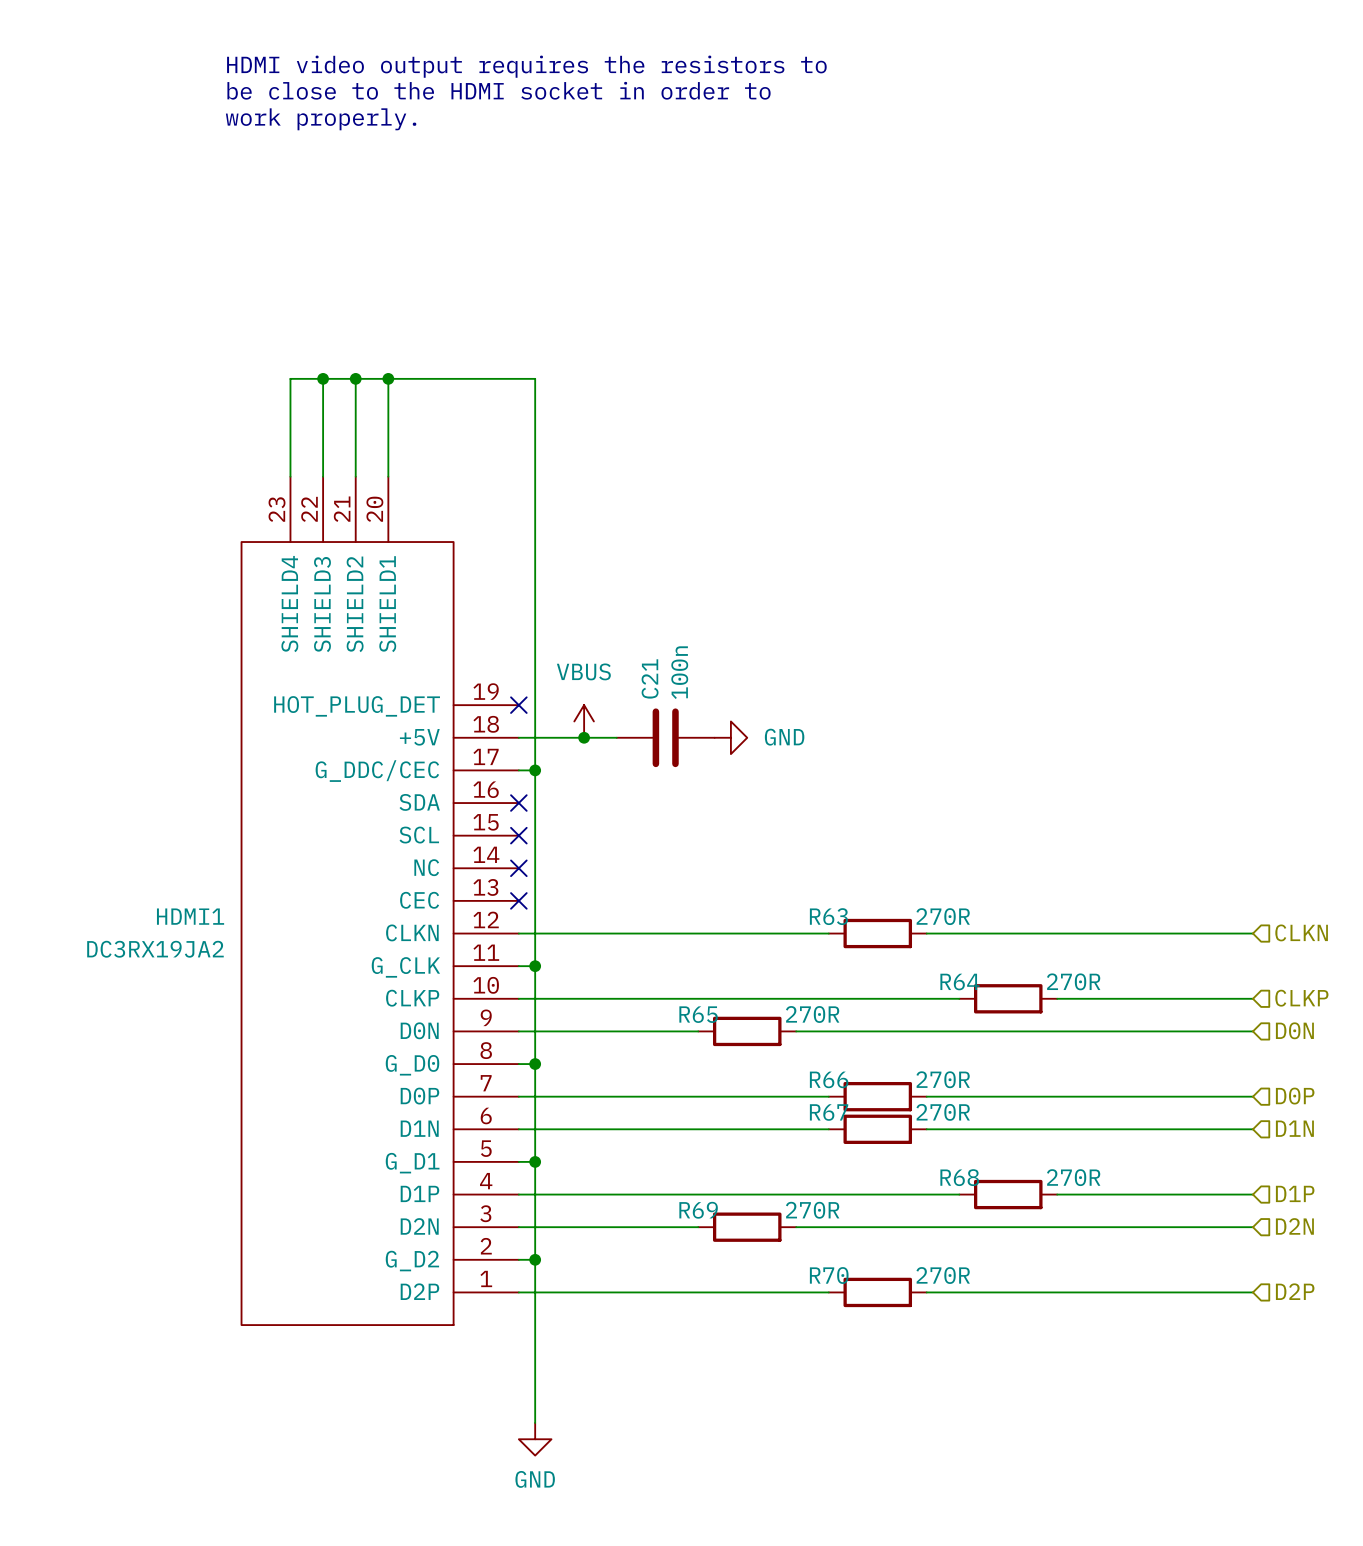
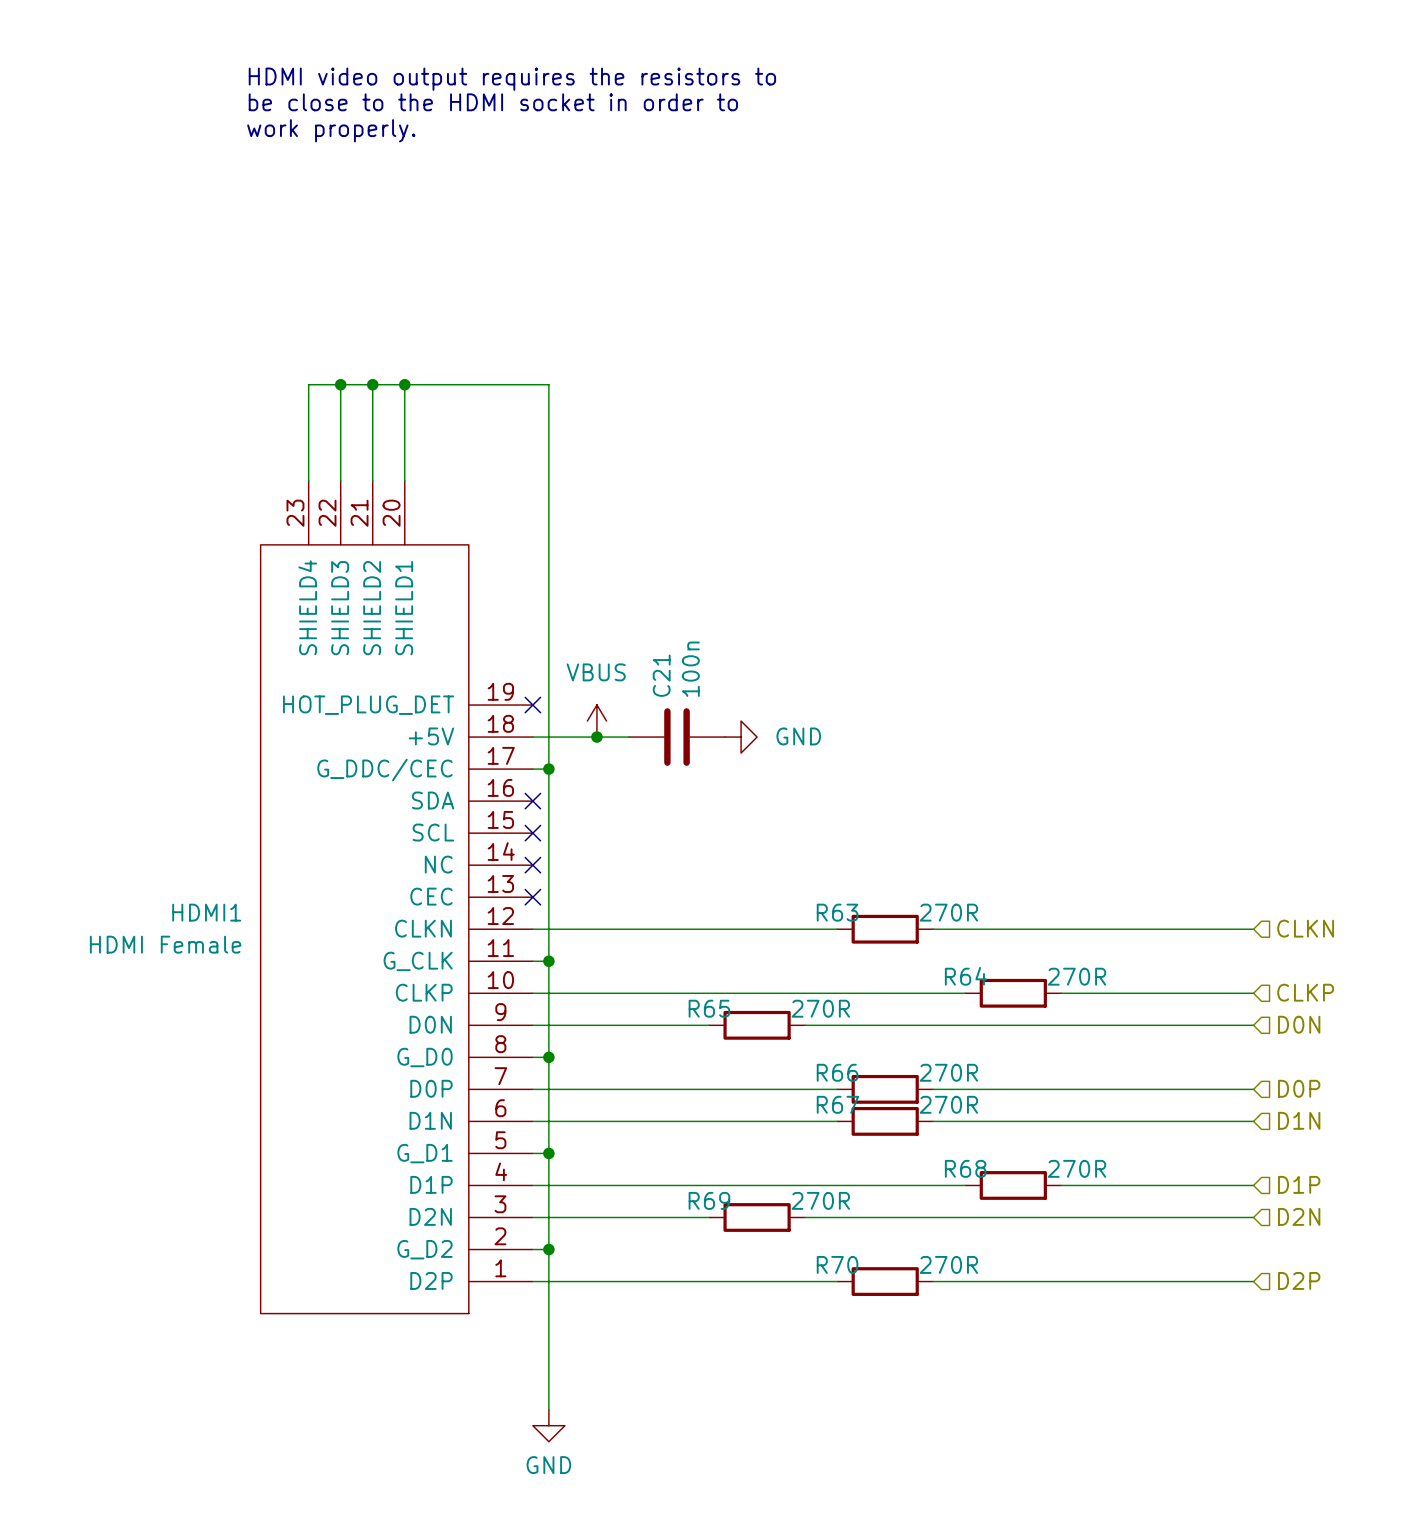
HDMI1 value: DC3RX19JA2 (155, 949) -> HDMI Female (165, 944)

